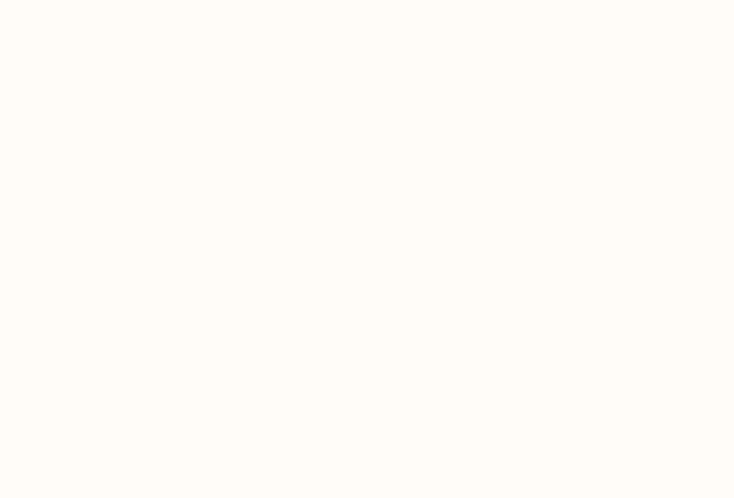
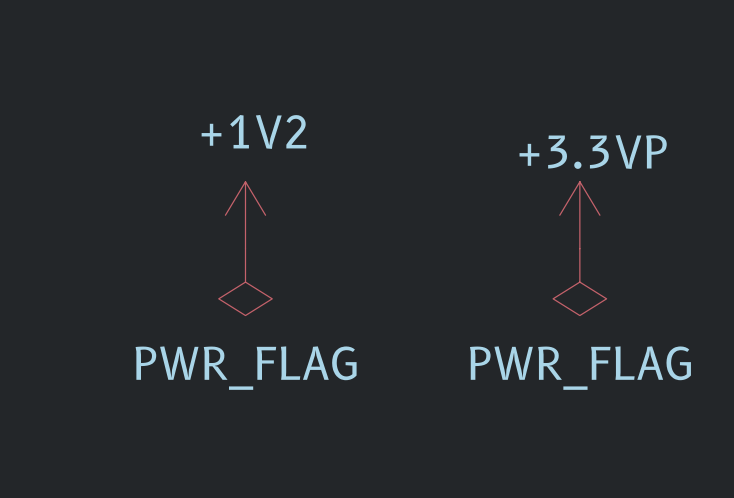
power symbol: none -> +1V2 (245, 215)
power symbol: none -> +3.3VP (579, 215)
power symbol: none -> PWR_FLAG (245, 282)
power symbol: none -> PWR_FLAG (579, 282)

